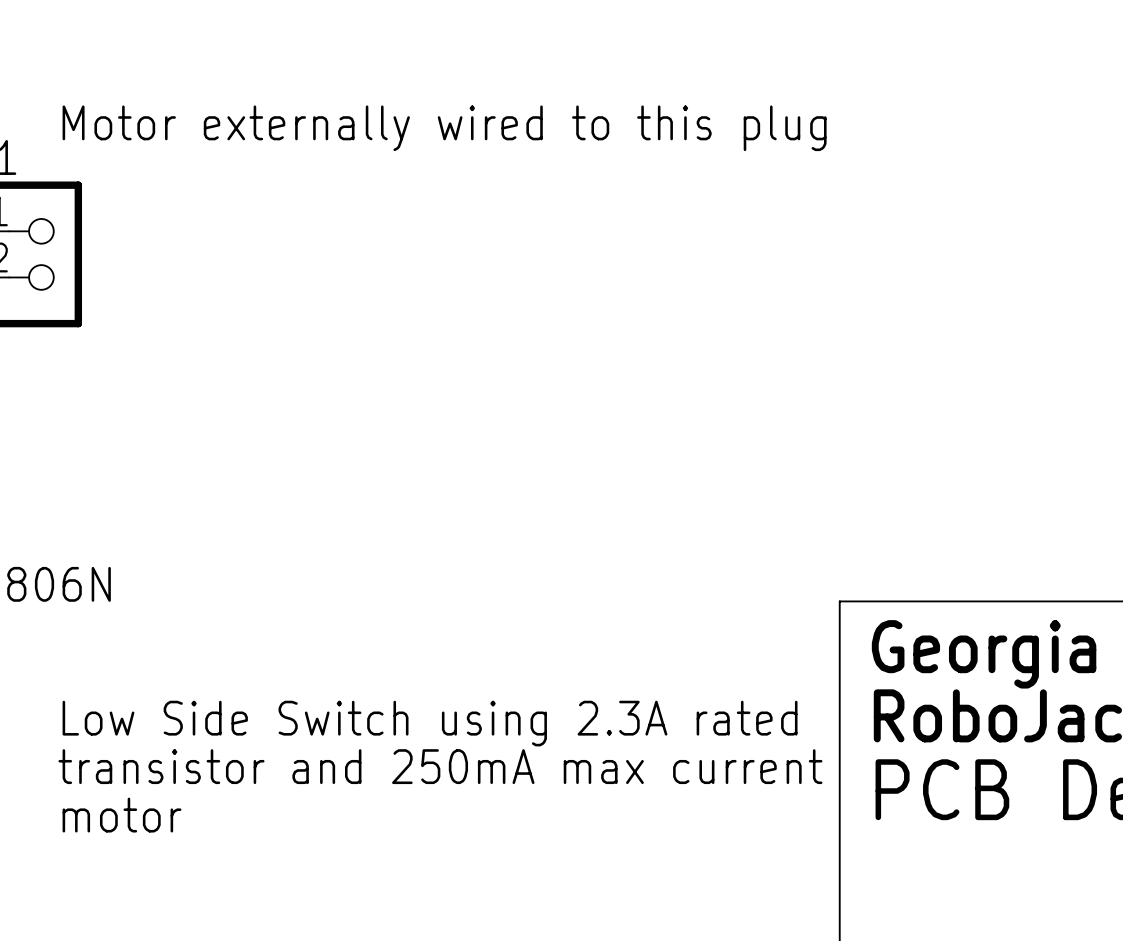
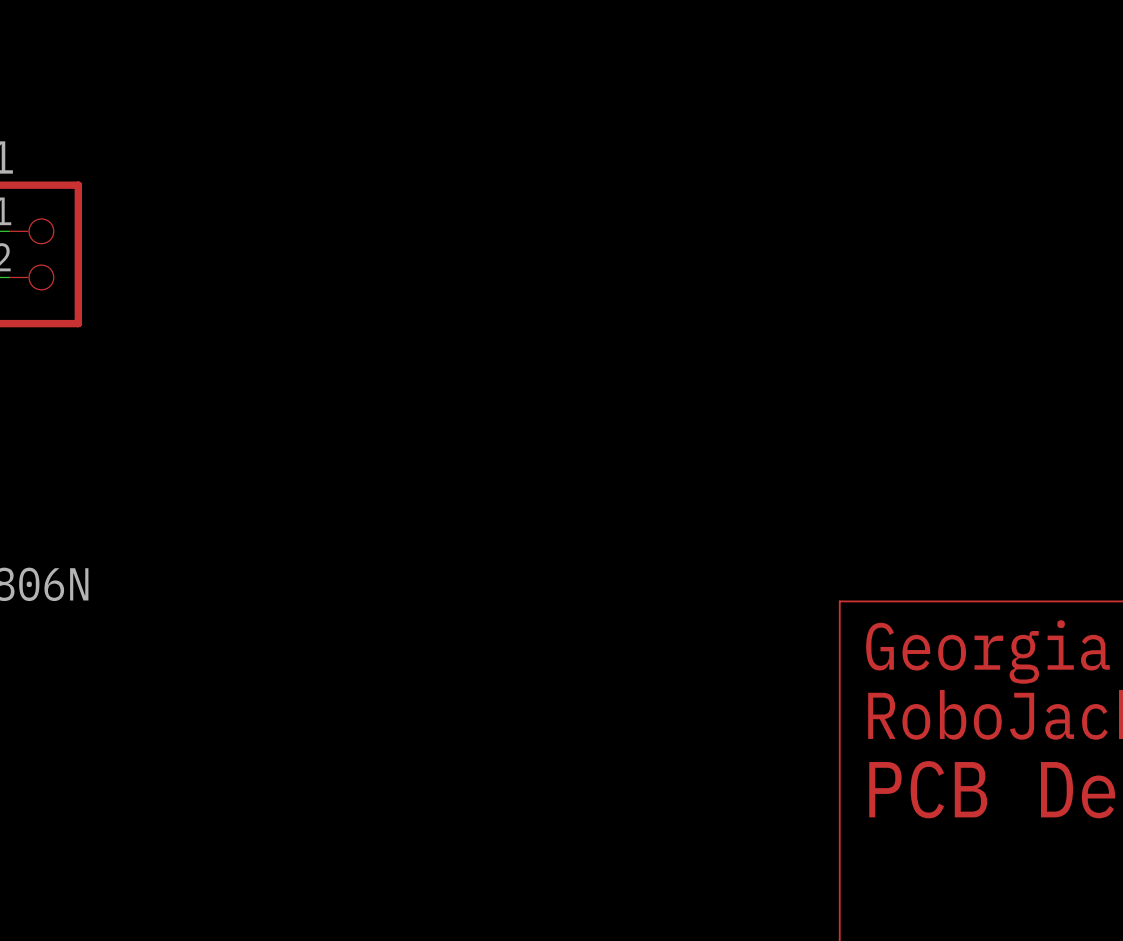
text: Motor externally wired to this plug (444, 128) -> none
text: Low Side Switch using 2.3A rated (430, 723) -> none
text: transistor and 250mA max current (440, 766) -> none
text: motor (122, 815) -> none

